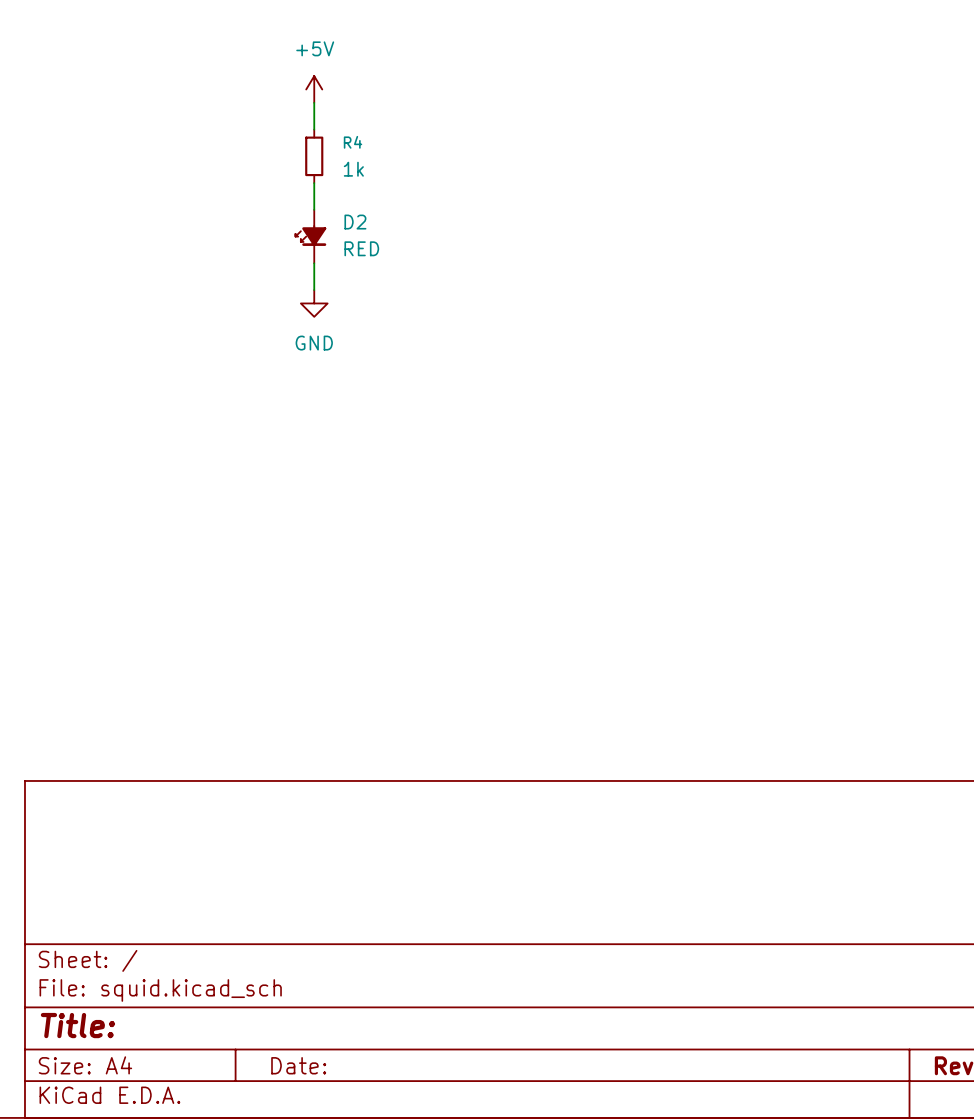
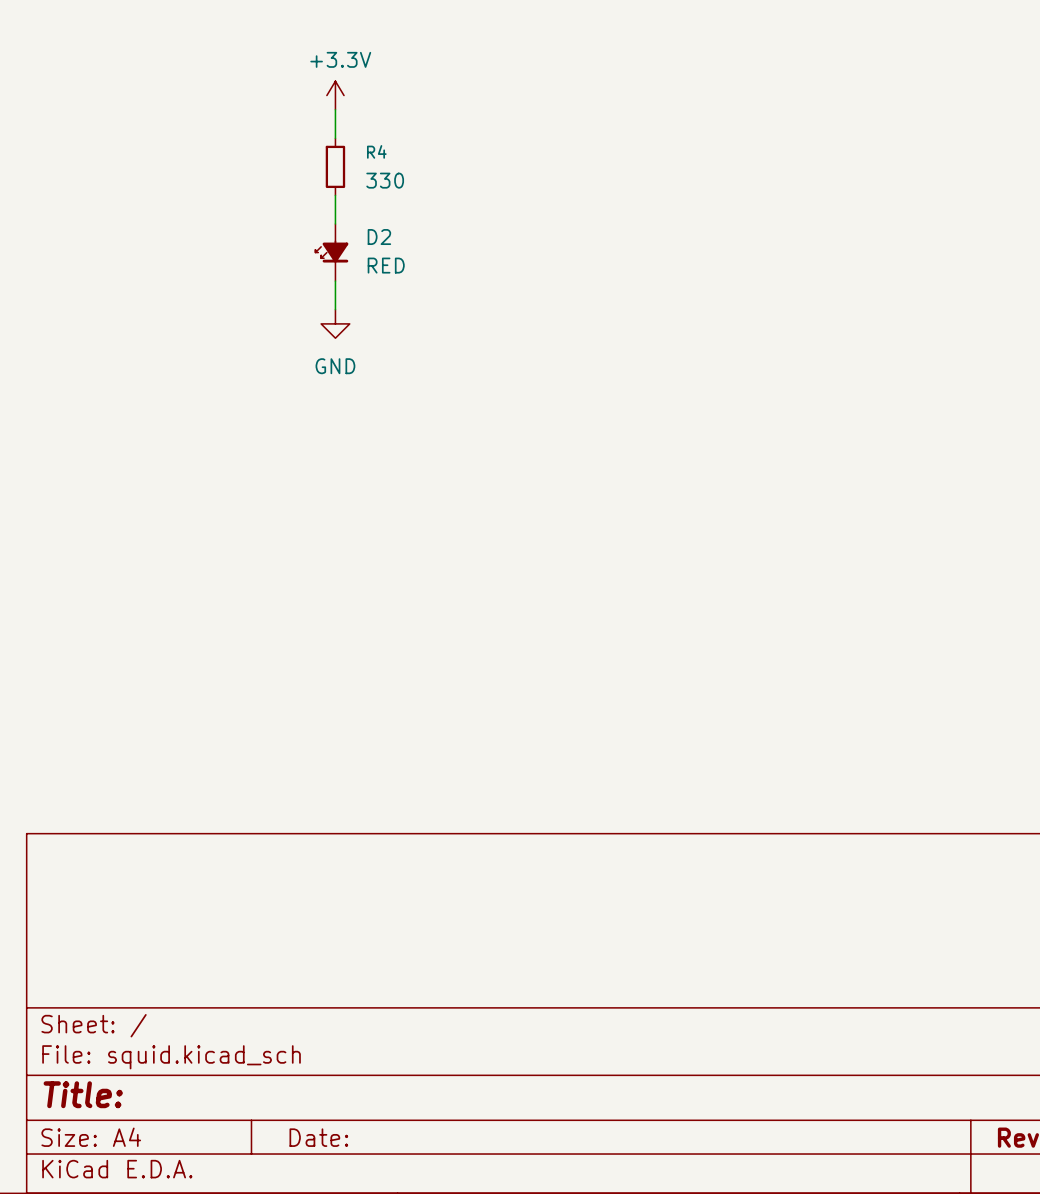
power symbol: +5V (314, 89) -> +3.3V (335, 95)
R4 value: 1k (353, 169) -> 330 (385, 180)

